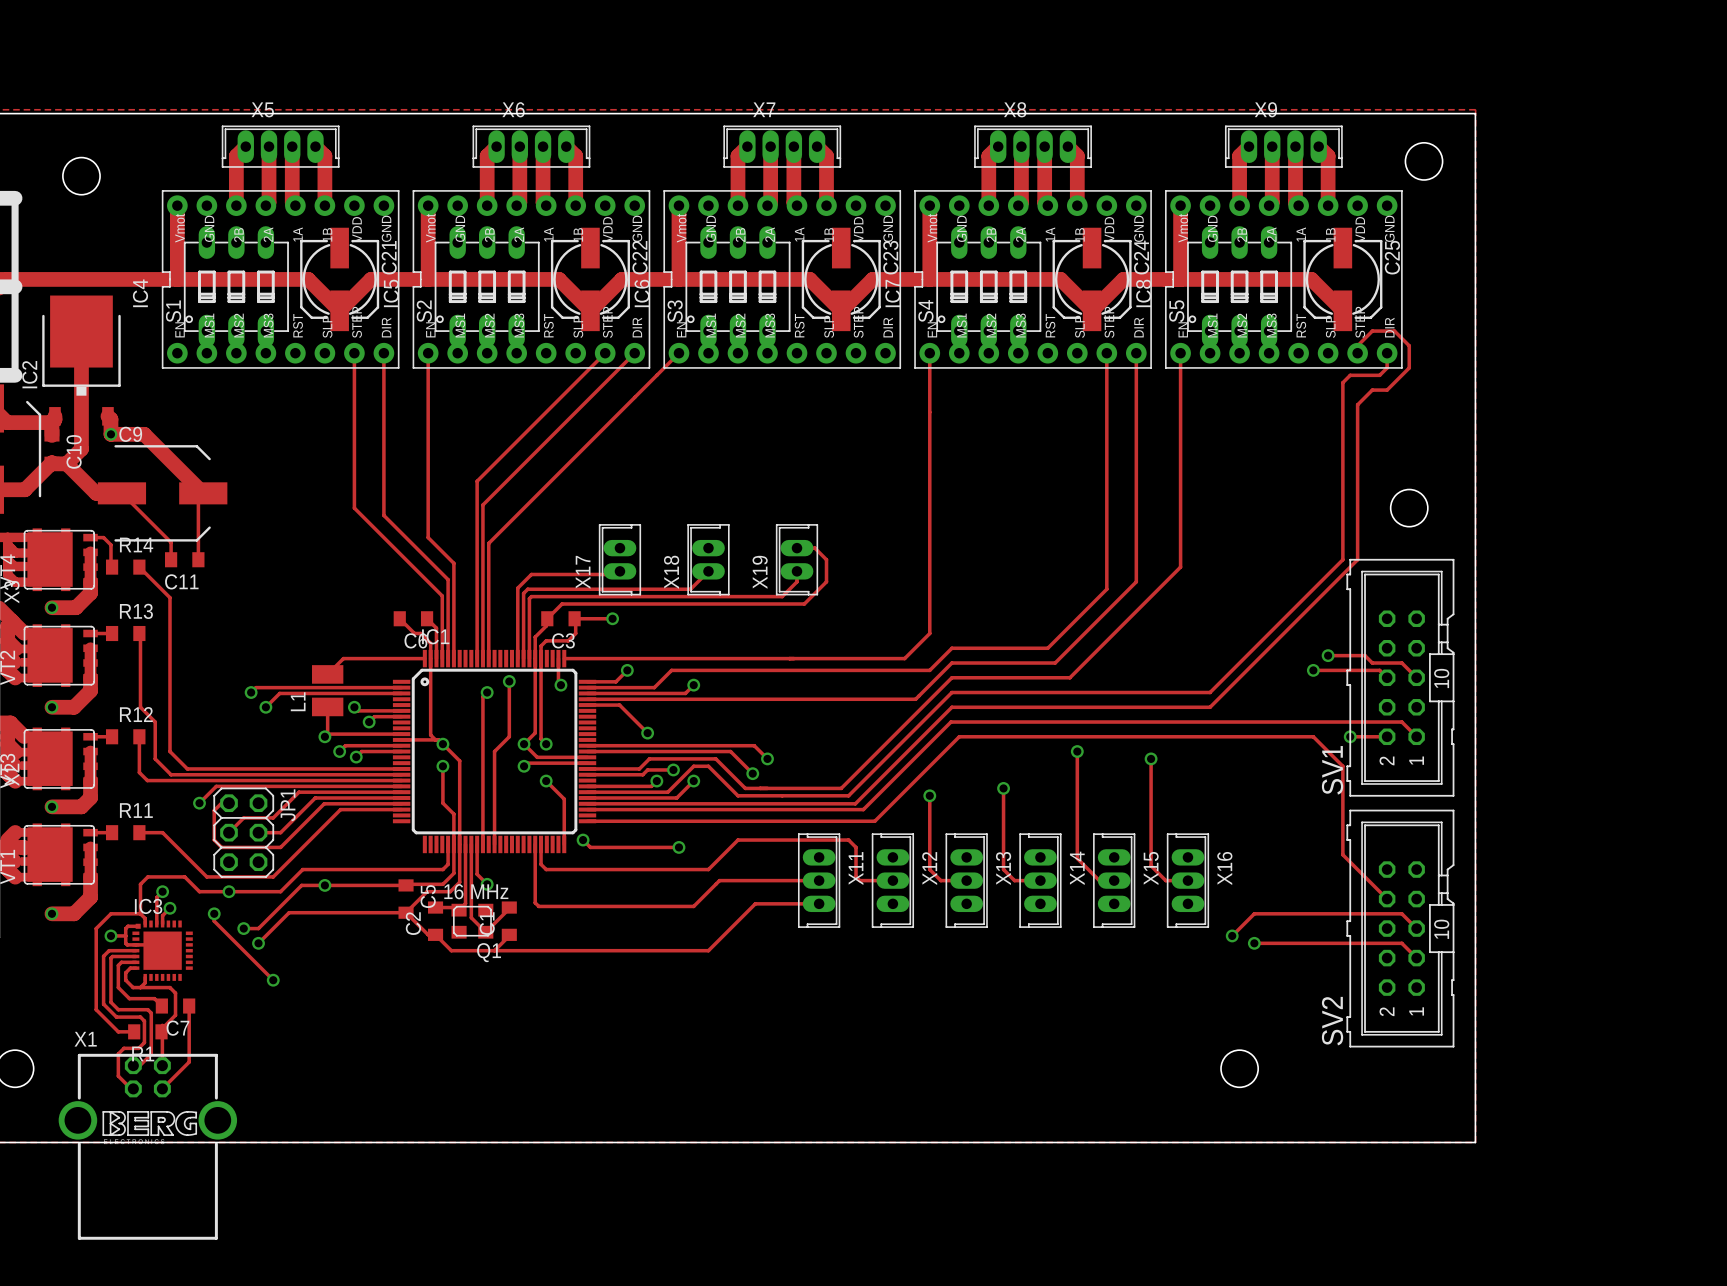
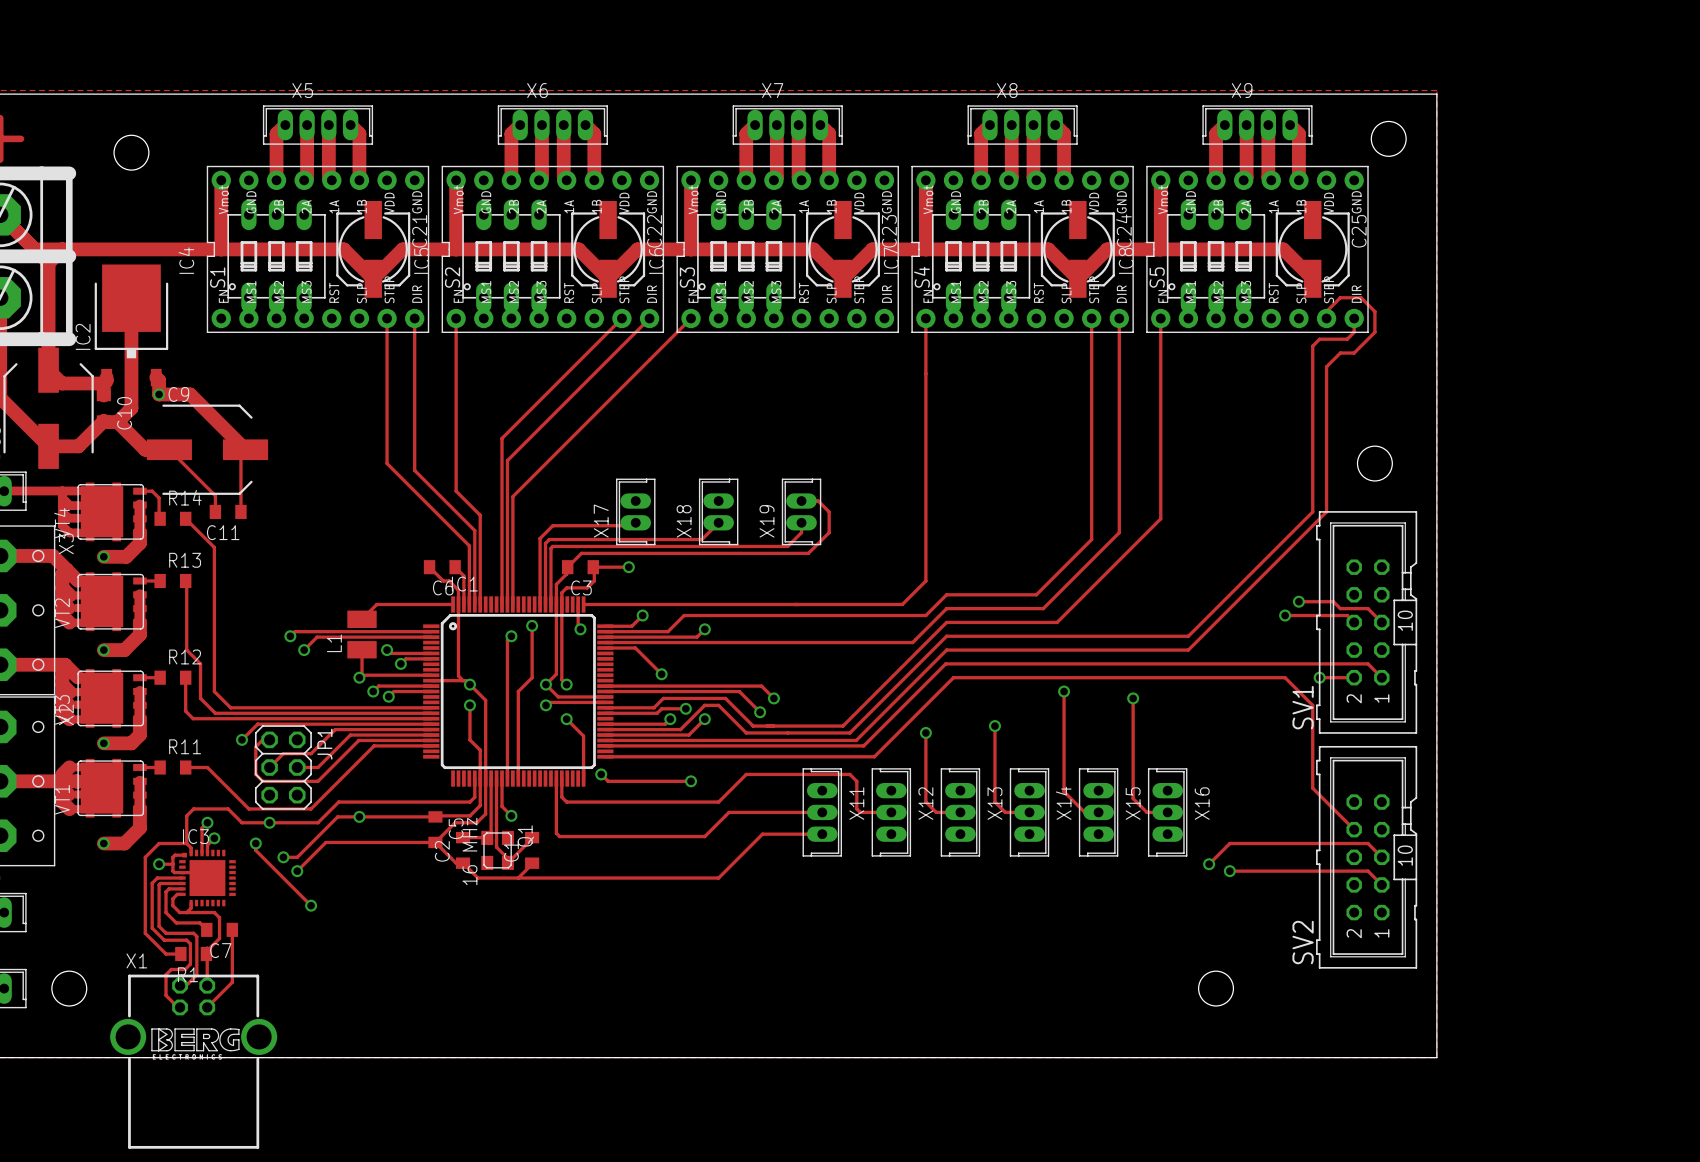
Q1 value position: 16 MHz (476, 891) -> 16 MHz (469, 851)
Q1 rotation: 0° (472, 921) -> 90° clockwise (497, 850)
Q1 name position: Q1 (489, 952) -> Q1 (525, 835)

